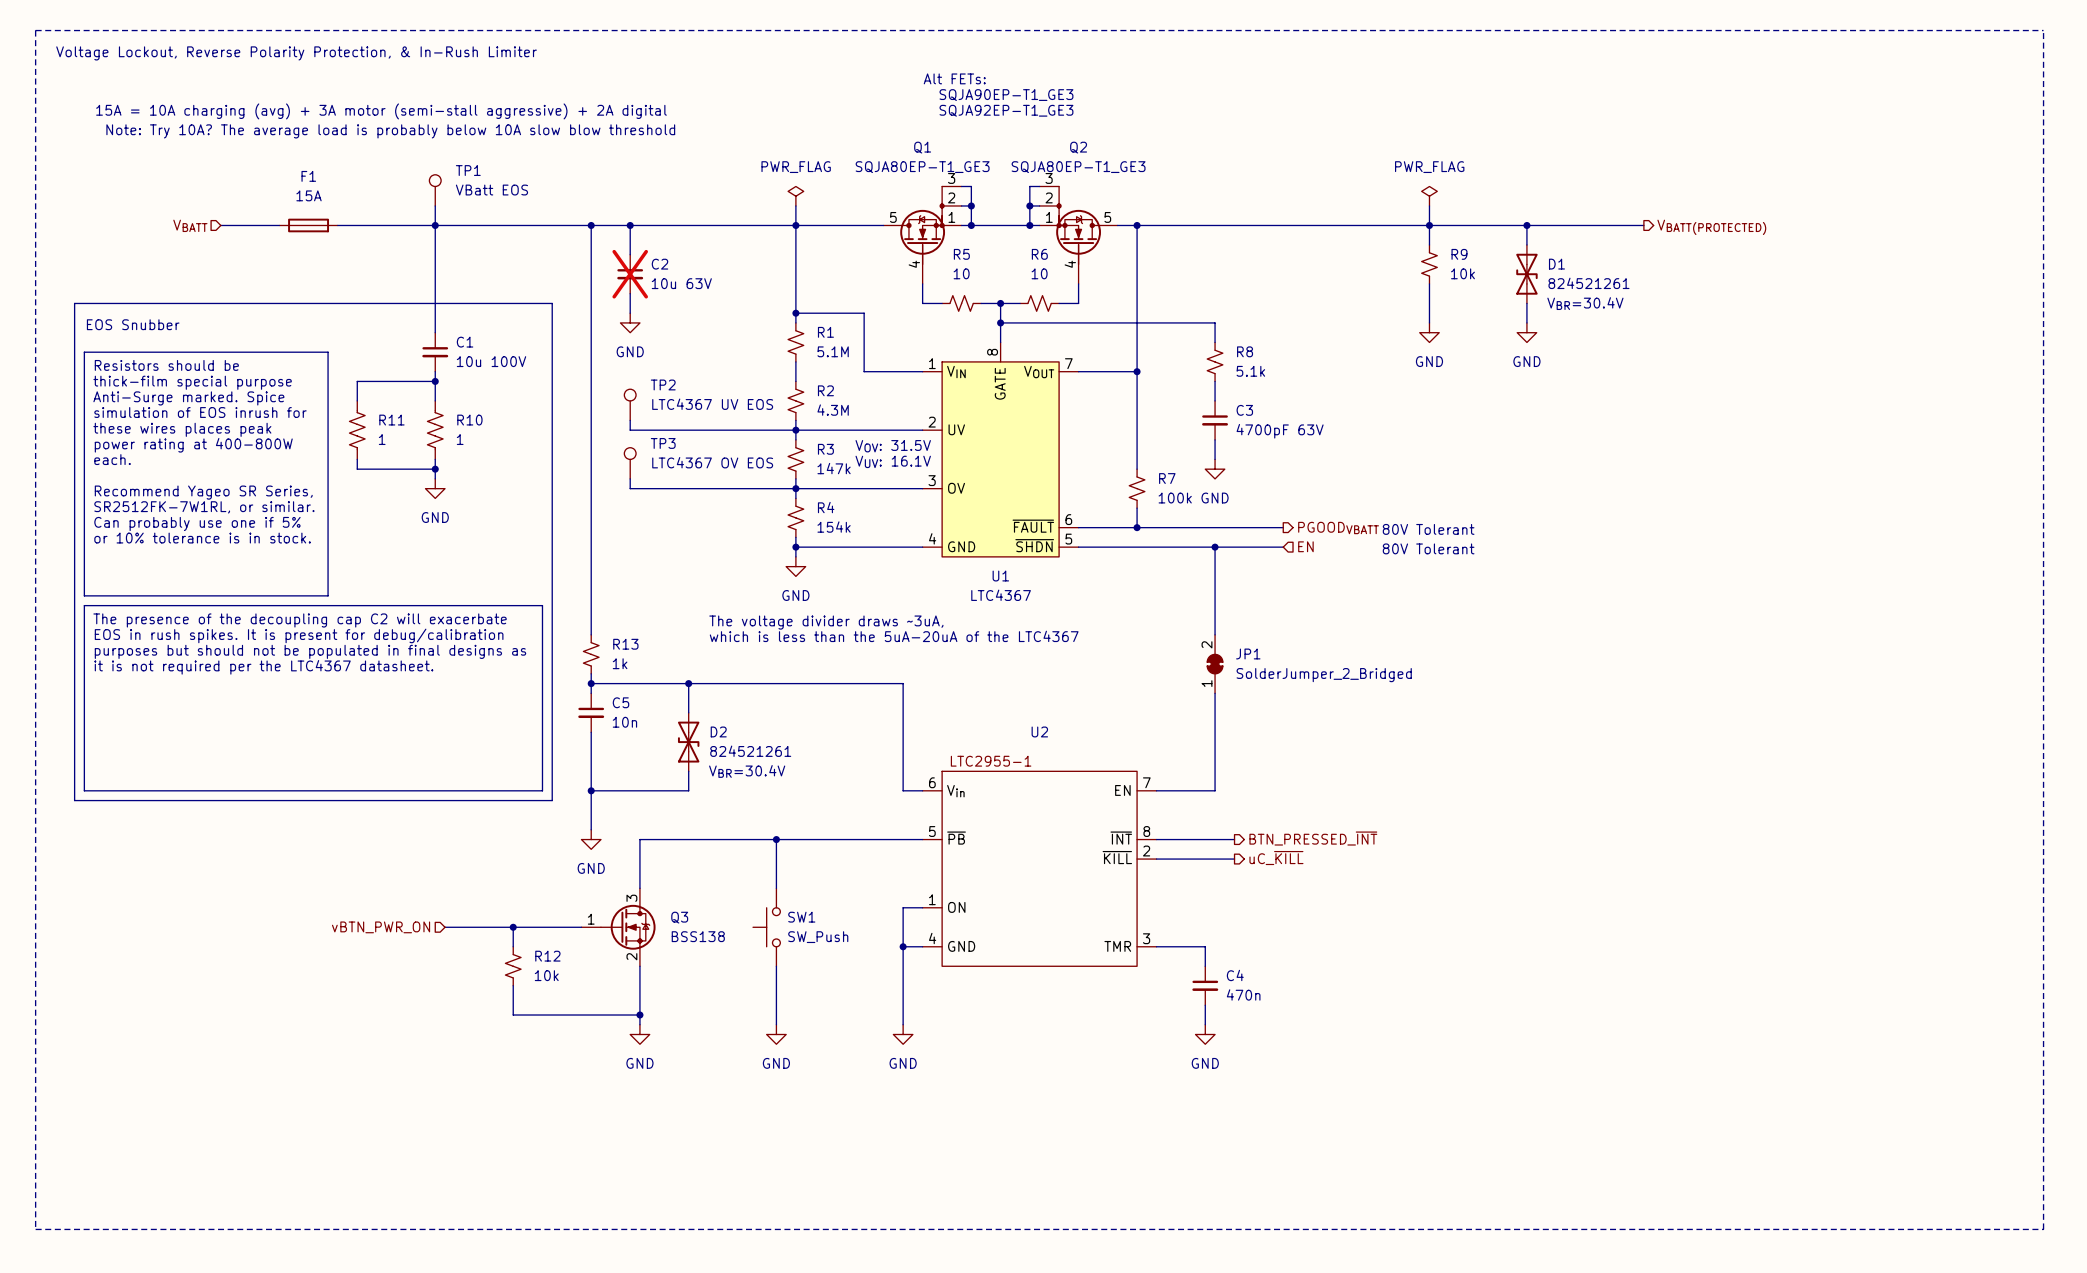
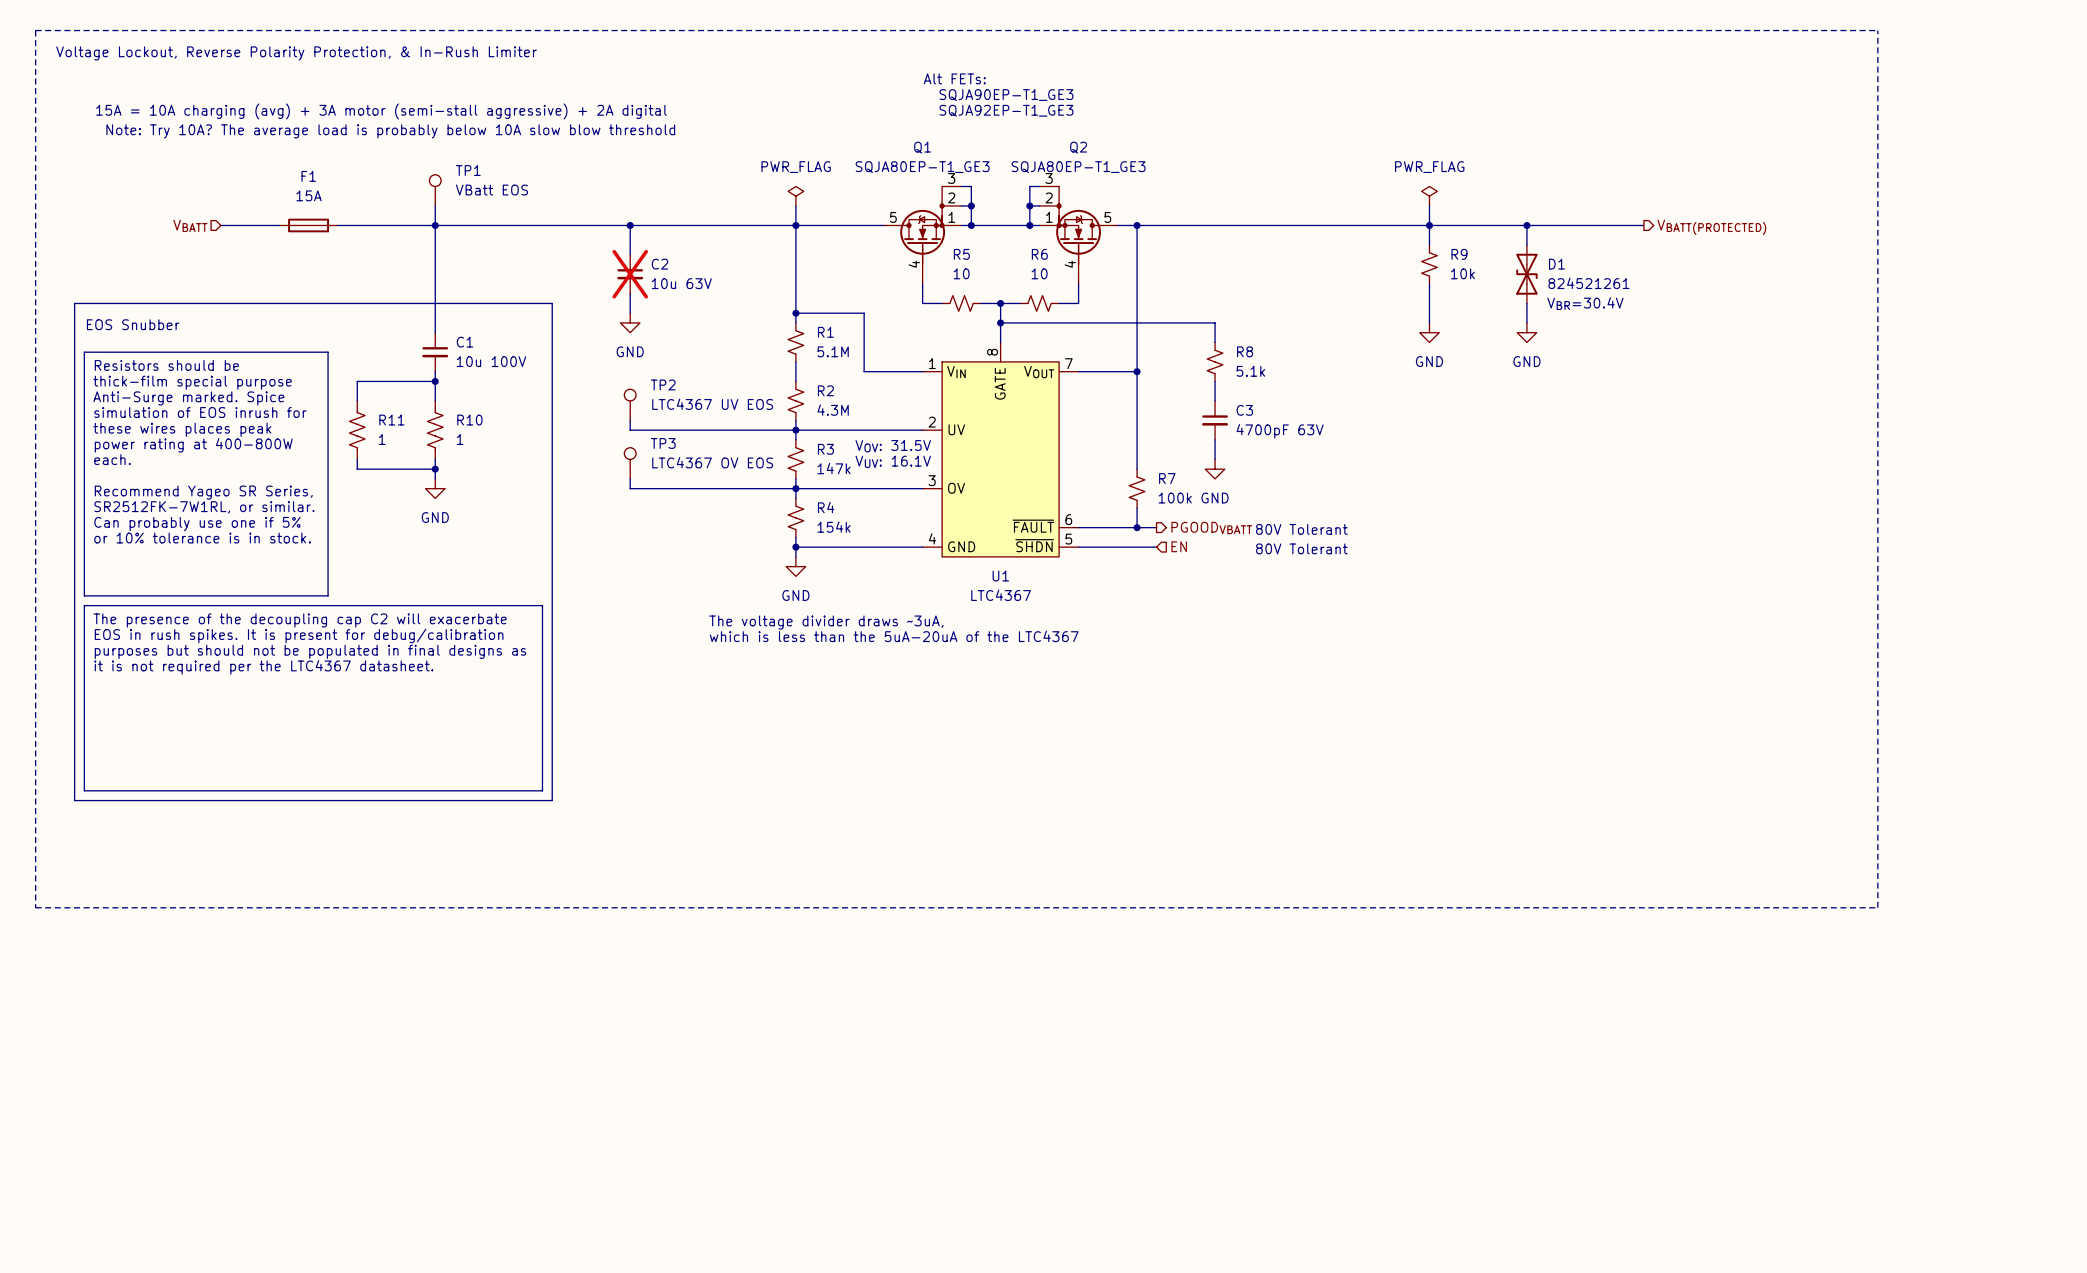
line: (1877, 30) (2043, 30) (2043, 1229) (35, 1229) (35, 907) -> (1877, 30) (1877, 907) (35, 907)
wire: (591, 225) (591, 634) -> none
junction: (591, 225) -> none
wire: (1156, 527) (1283, 527) -> none
hierarchical label position: PGOODVBATT (1338, 528) -> PGOODVBATT (1211, 528)
text: none -> 80V Tolerant (1301, 529)
text: 80V Tolerant (1428, 529) -> none
hierarchical label position: EN (1305, 546) -> EN (1179, 546)
wire: (1156, 547) (1283, 547) -> none
wire: (1215, 547) (1215, 634) -> none
junction: (1215, 547) -> none
text: none -> 80V Tolerant (1301, 548)
text: 80V Tolerant (1428, 548) -> none
R13: 1k (591, 654) -> none
JP1: SolderJumper_2_Bridged (1215, 664) -> none
wire: (591, 673) (591, 693) -> none
wire: (591, 683) (903, 683) (903, 790) (922, 790) -> none
junction: (591, 683) -> none
wire: (688, 683) (688, 712) -> none
junction: (688, 683) -> none
wire: (1215, 693) (1215, 790) (1156, 790) -> none
C5: 10n (591, 712) -> none
wire: (591, 732) (591, 829) -> none
D2: 824521261 (688, 742) -> none
wire: (688, 771) (688, 790) (591, 790) -> none
junction: (591, 790) -> none
hierarchical label: BTN_PRESSED_~{INT} (1313, 838) -> none
power symbol: GND (591, 839) -> none
wire: (776, 839) (776, 888) -> none
junction: (776, 839) -> none
wire: (922, 839) (639, 839) (639, 888) -> none
wire: (1156, 839) (1234, 839) -> none
hierarchical label: uC_~{KILL} (1276, 858) -> none
wire: (1156, 859) (1234, 859) -> none
U2: (1039, 868) -> none
wire: (922, 907) (903, 907) (903, 1024) -> none
hierarchical label: vBTN_PWR_ON (381, 927) -> none
wire: (445, 927) (581, 927) -> none
wire: (513, 927) (513, 946) -> none
junction: (513, 927) -> none
Q3: BSS138 (618, 927) -> none
SW1: SW_Push (766, 927) -> none
wire: (903, 946) (922, 946) -> none
junction: (903, 946) -> none
wire: (1156, 946) (1205, 946) (1205, 966) -> none
R12: 10k (513, 966) -> none
wire: (639, 966) (639, 1024) -> none
wire: (776, 966) (776, 1024) -> none
wire: (513, 985) (513, 1015) (639, 1015) -> none
C4: 470n (1205, 985) -> none
wire: (1205, 1005) (1205, 1024) -> none
junction: (639, 1015) -> none
power symbol: GND (639, 1034) -> none
power symbol: GND (776, 1034) -> none
power symbol: GND (903, 1034) -> none
power symbol: GND (1205, 1034) -> none

